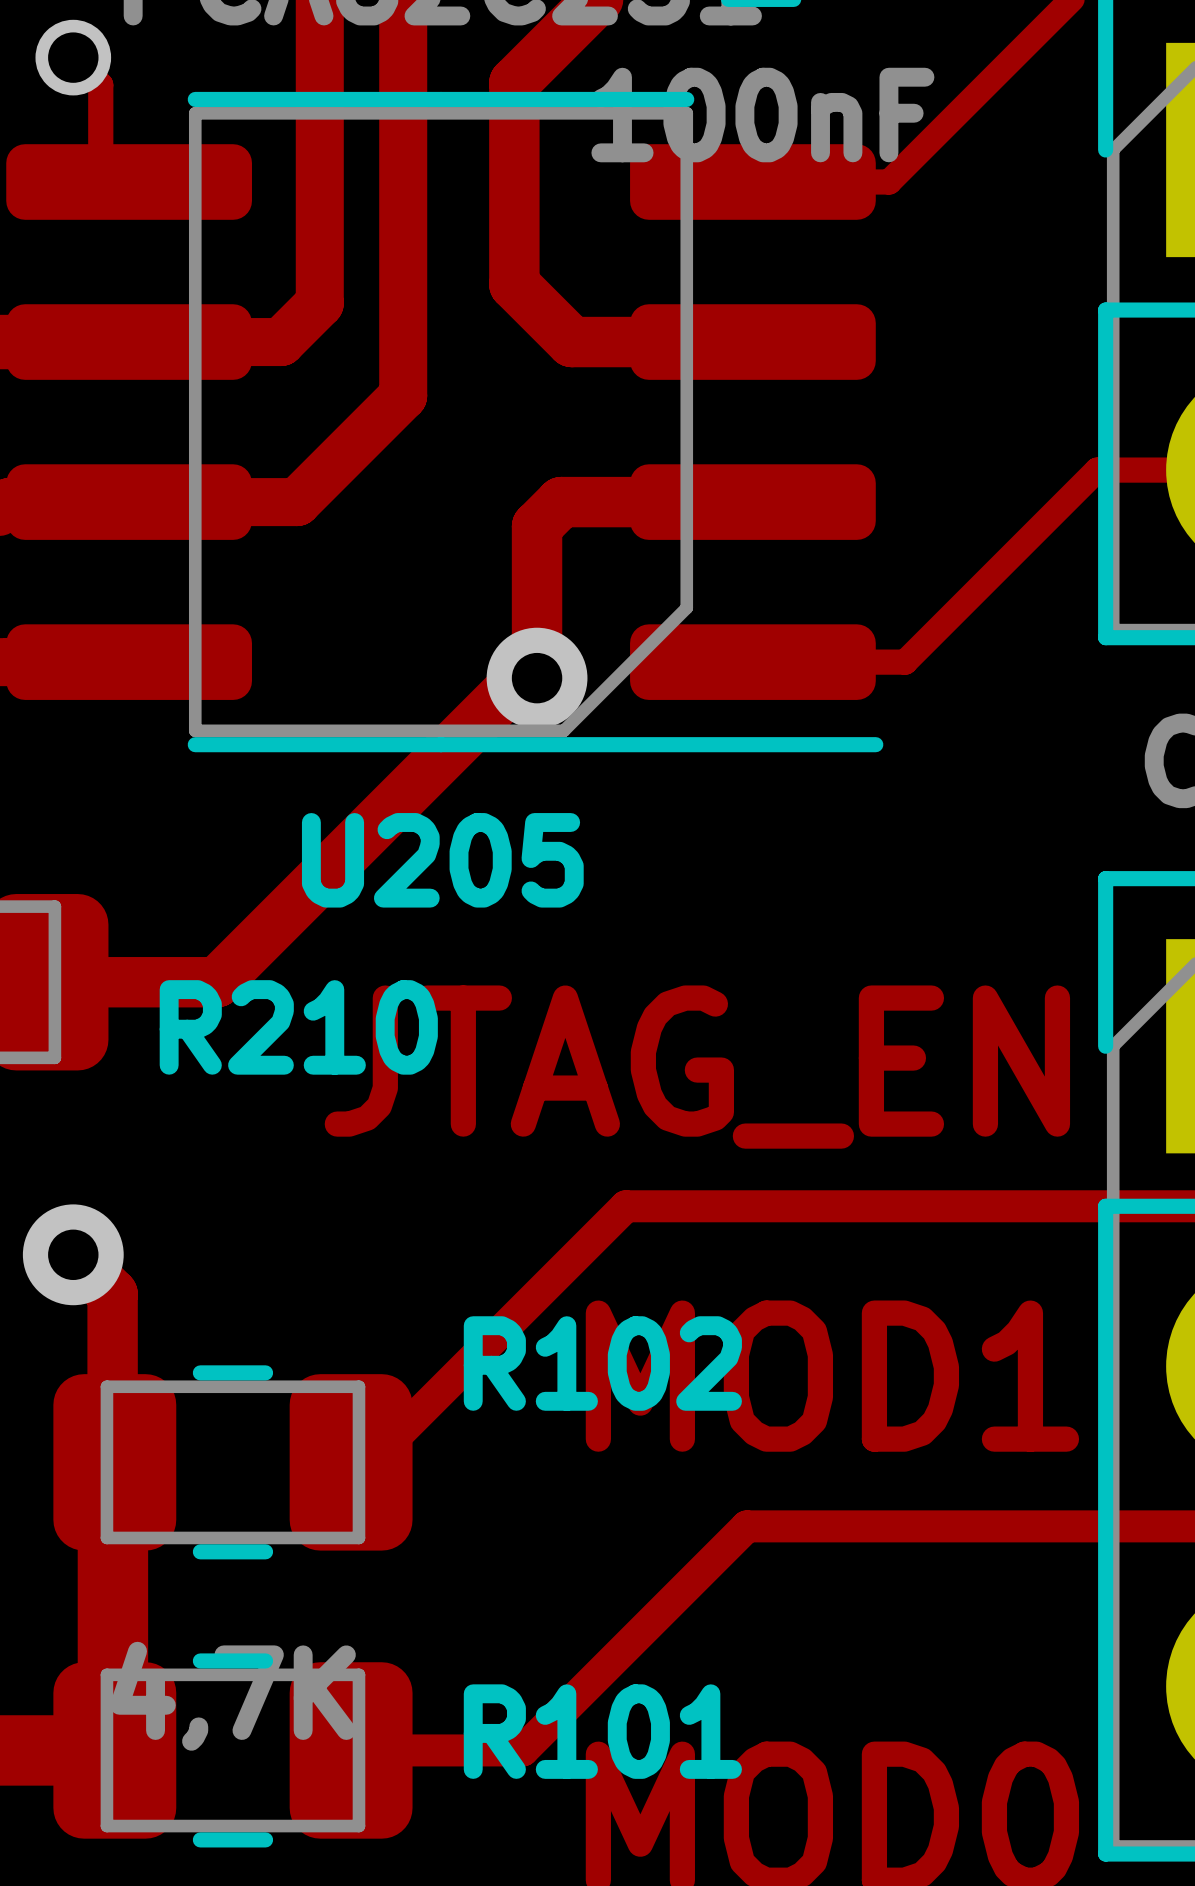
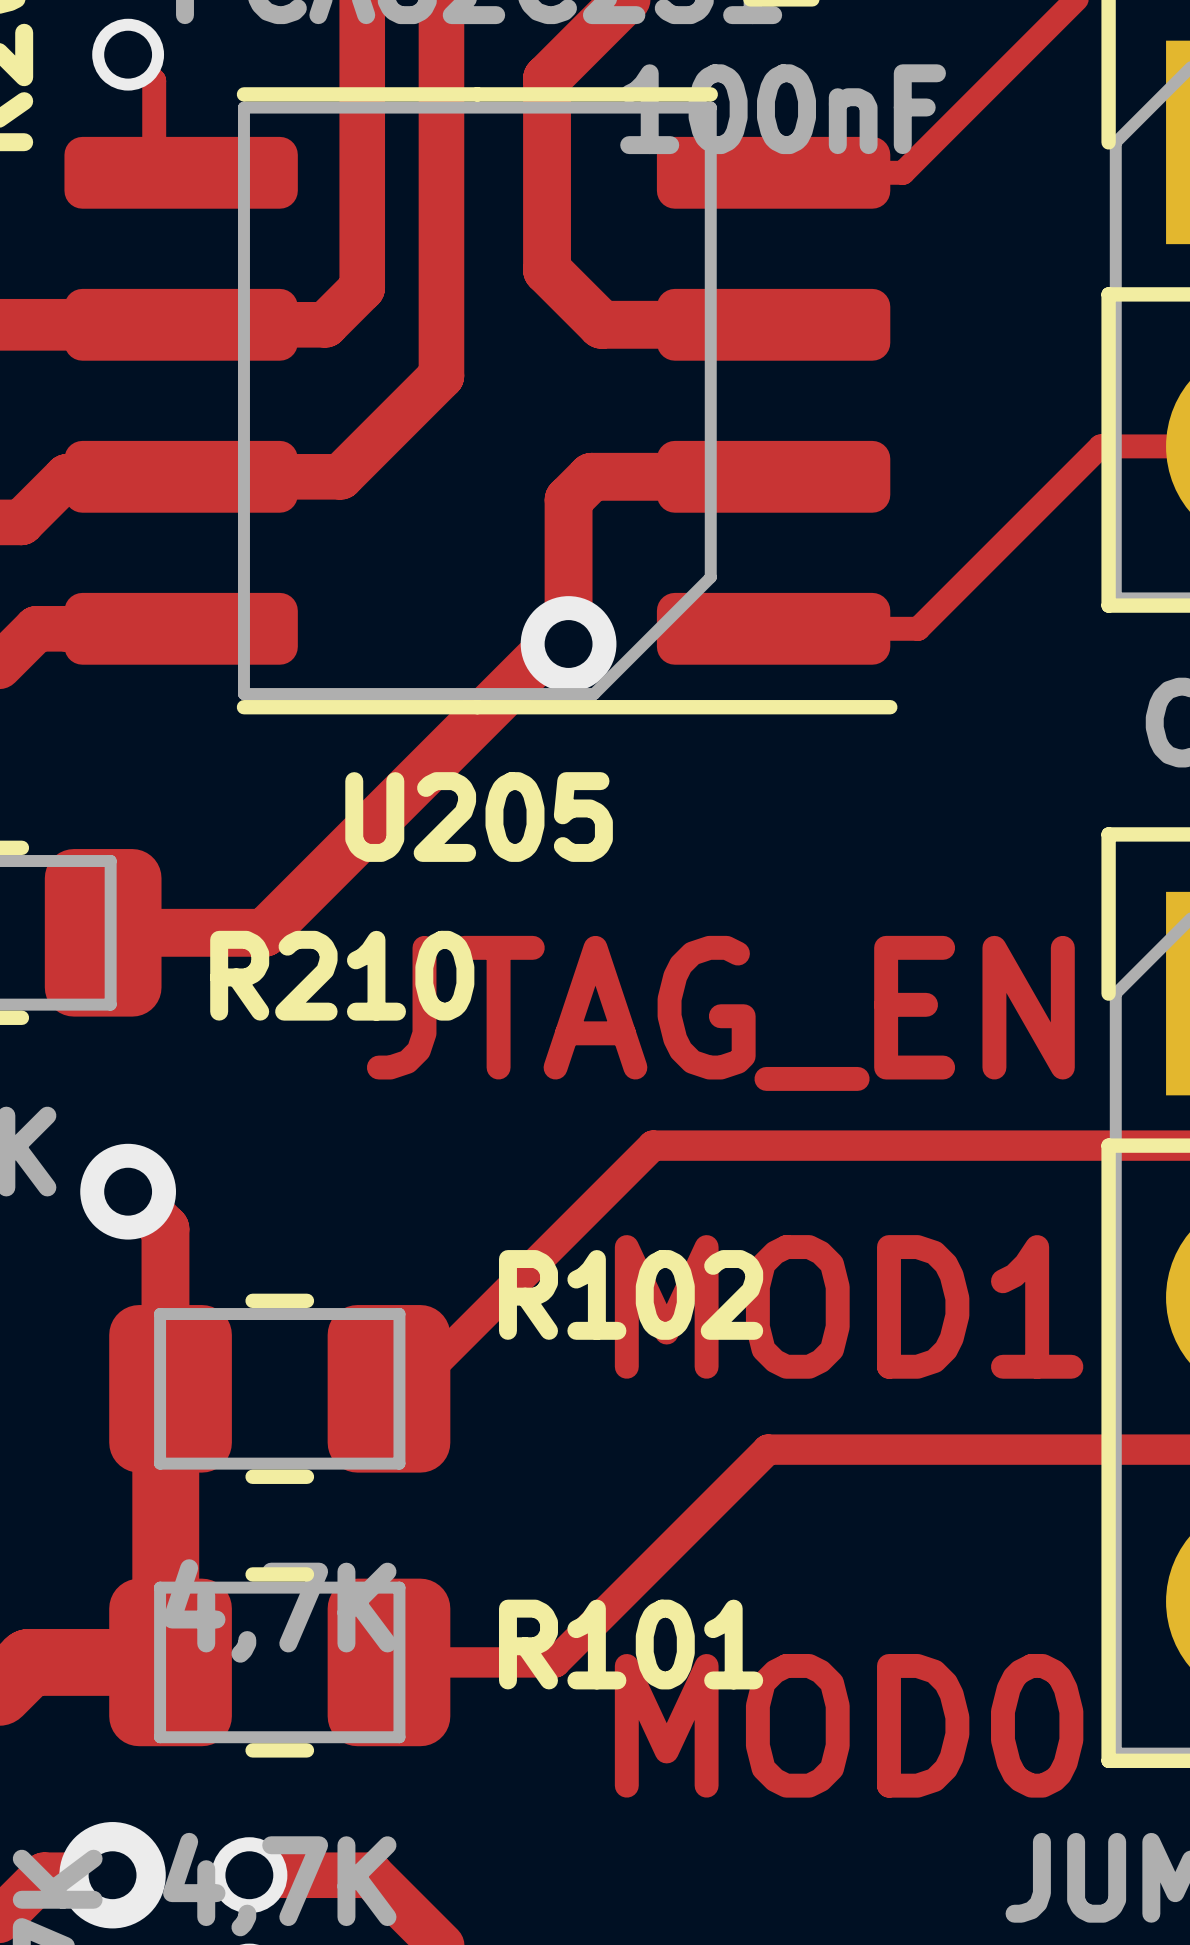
R102 footprint: [53, 1365, 413, 1560] -> [109, 1293, 451, 1484]
R101 footprint: [53, 1653, 413, 1848] -> [109, 1567, 451, 1758]

